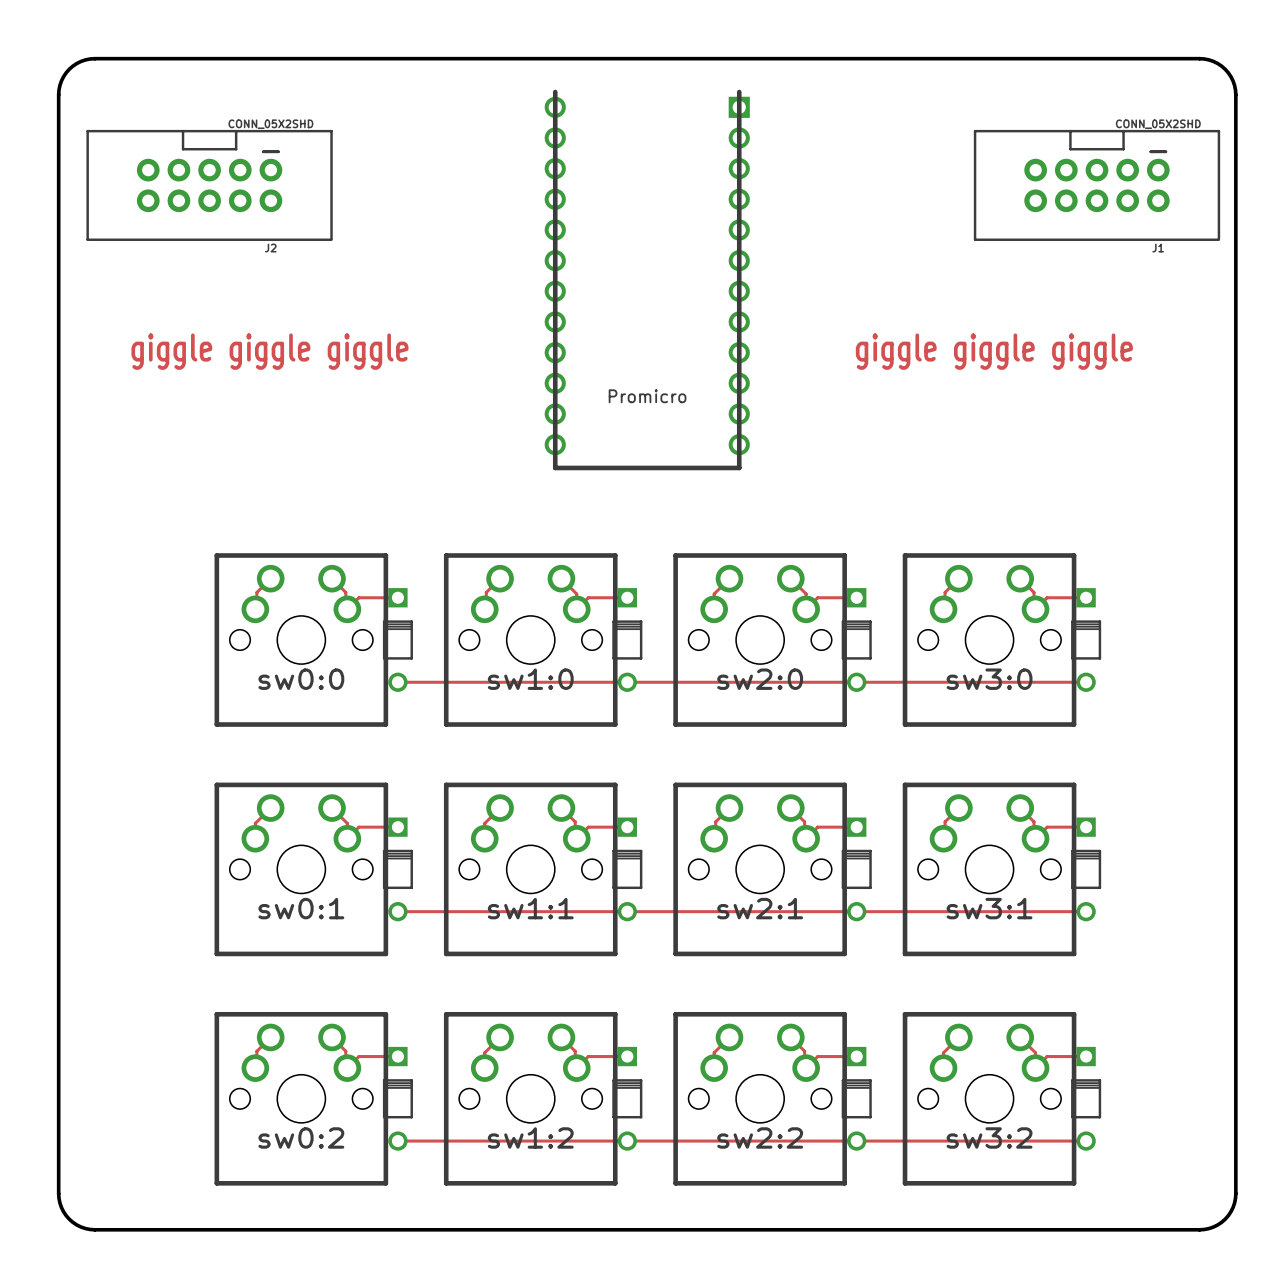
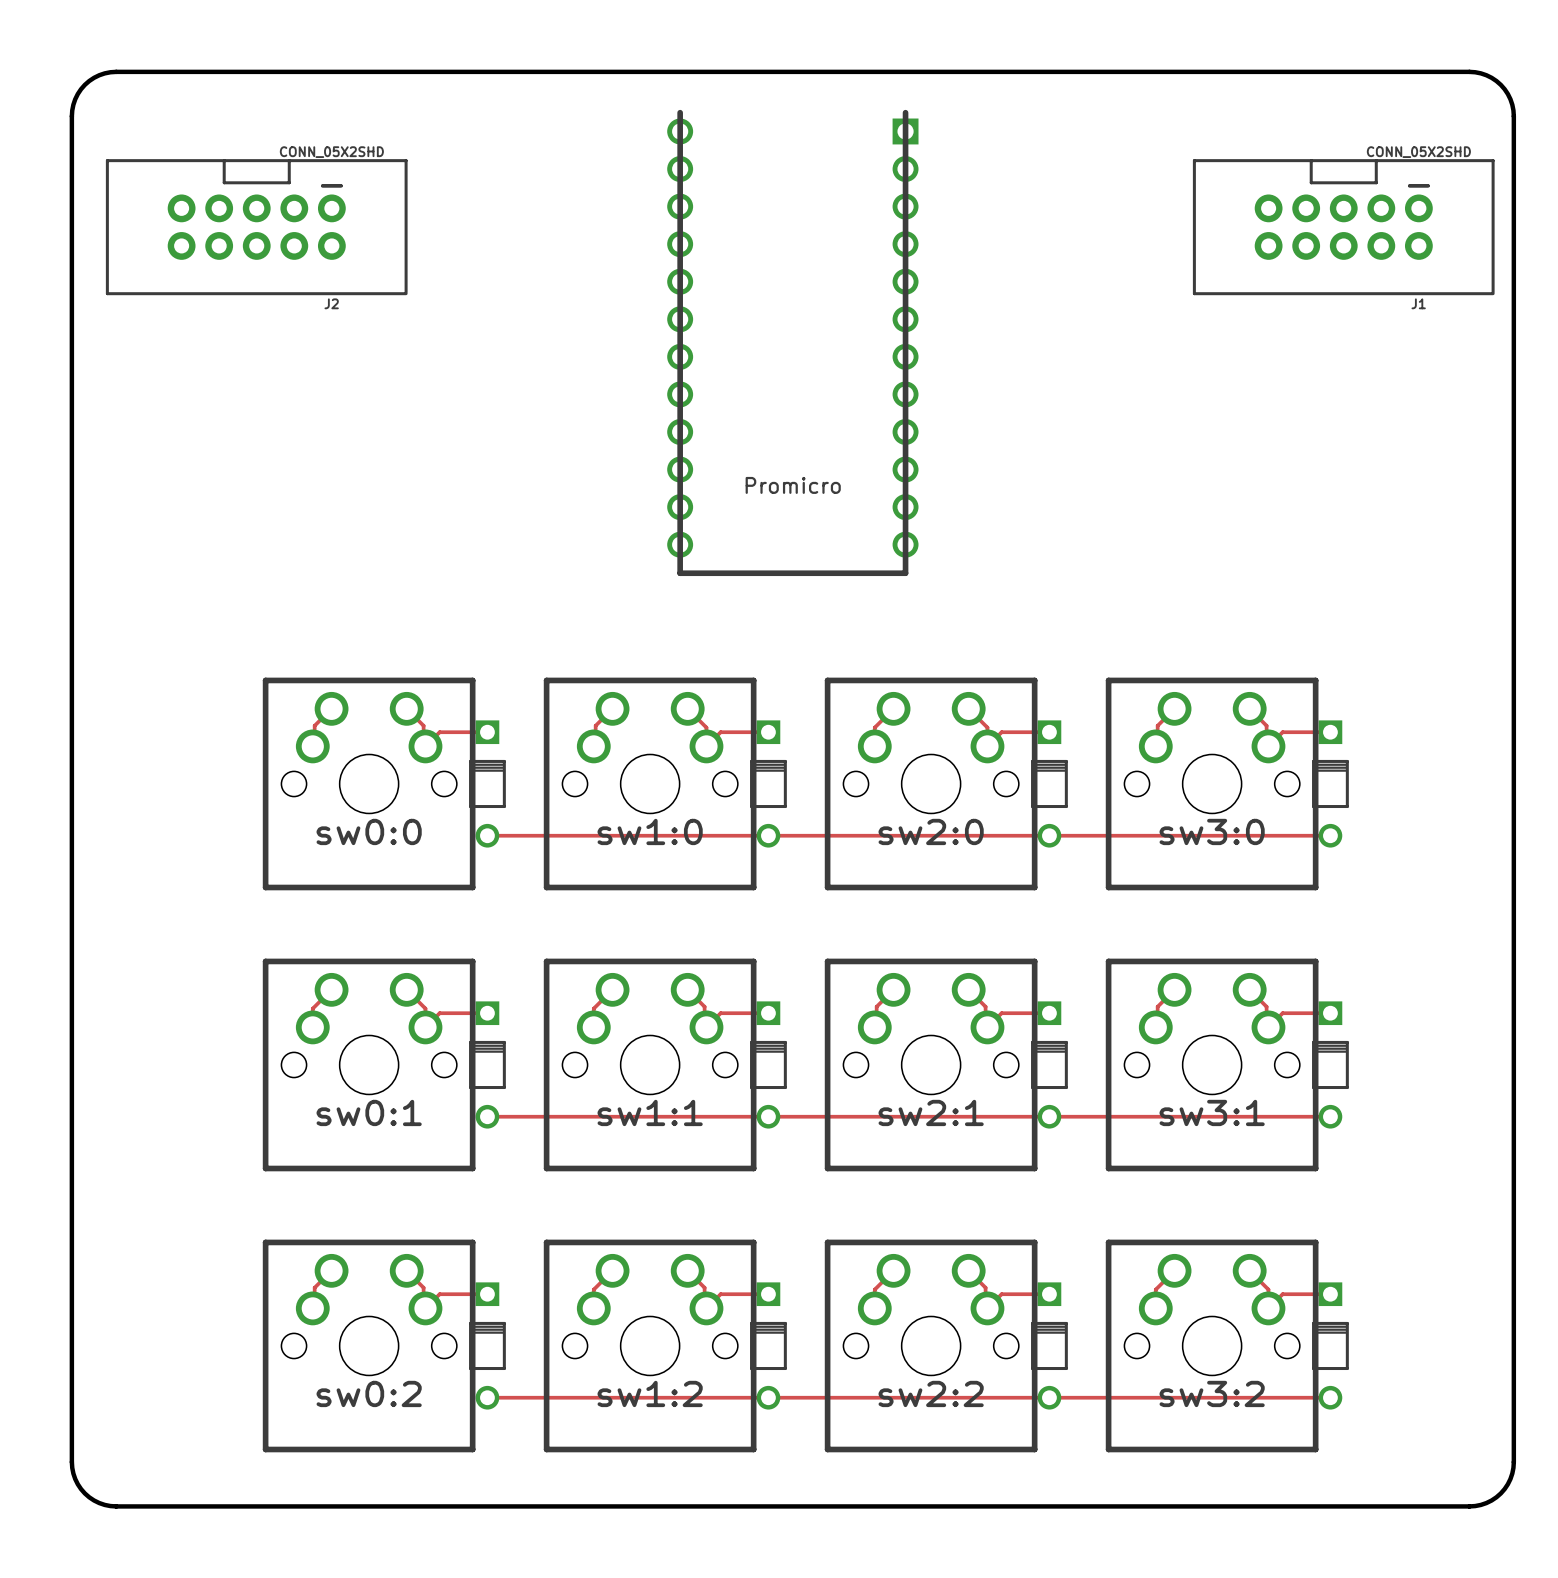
text: giggle giggle giggle (269, 351) -> none
text: giggle giggle giggle (994, 351) -> none

